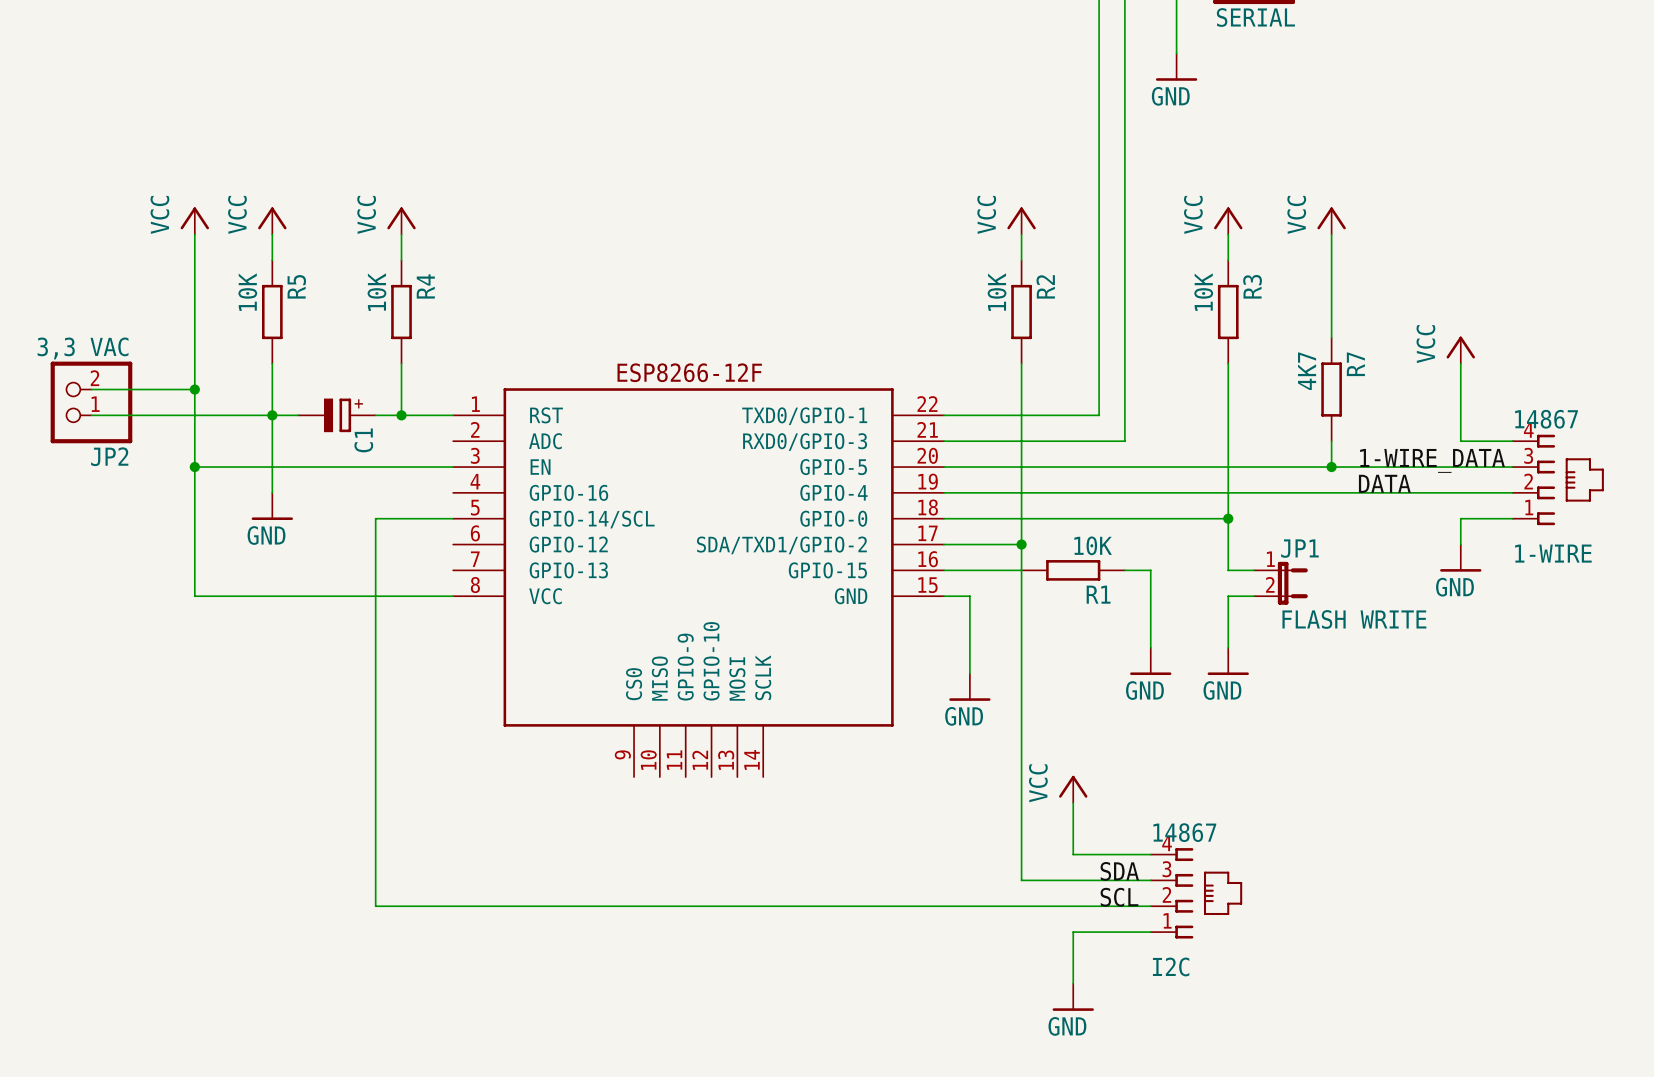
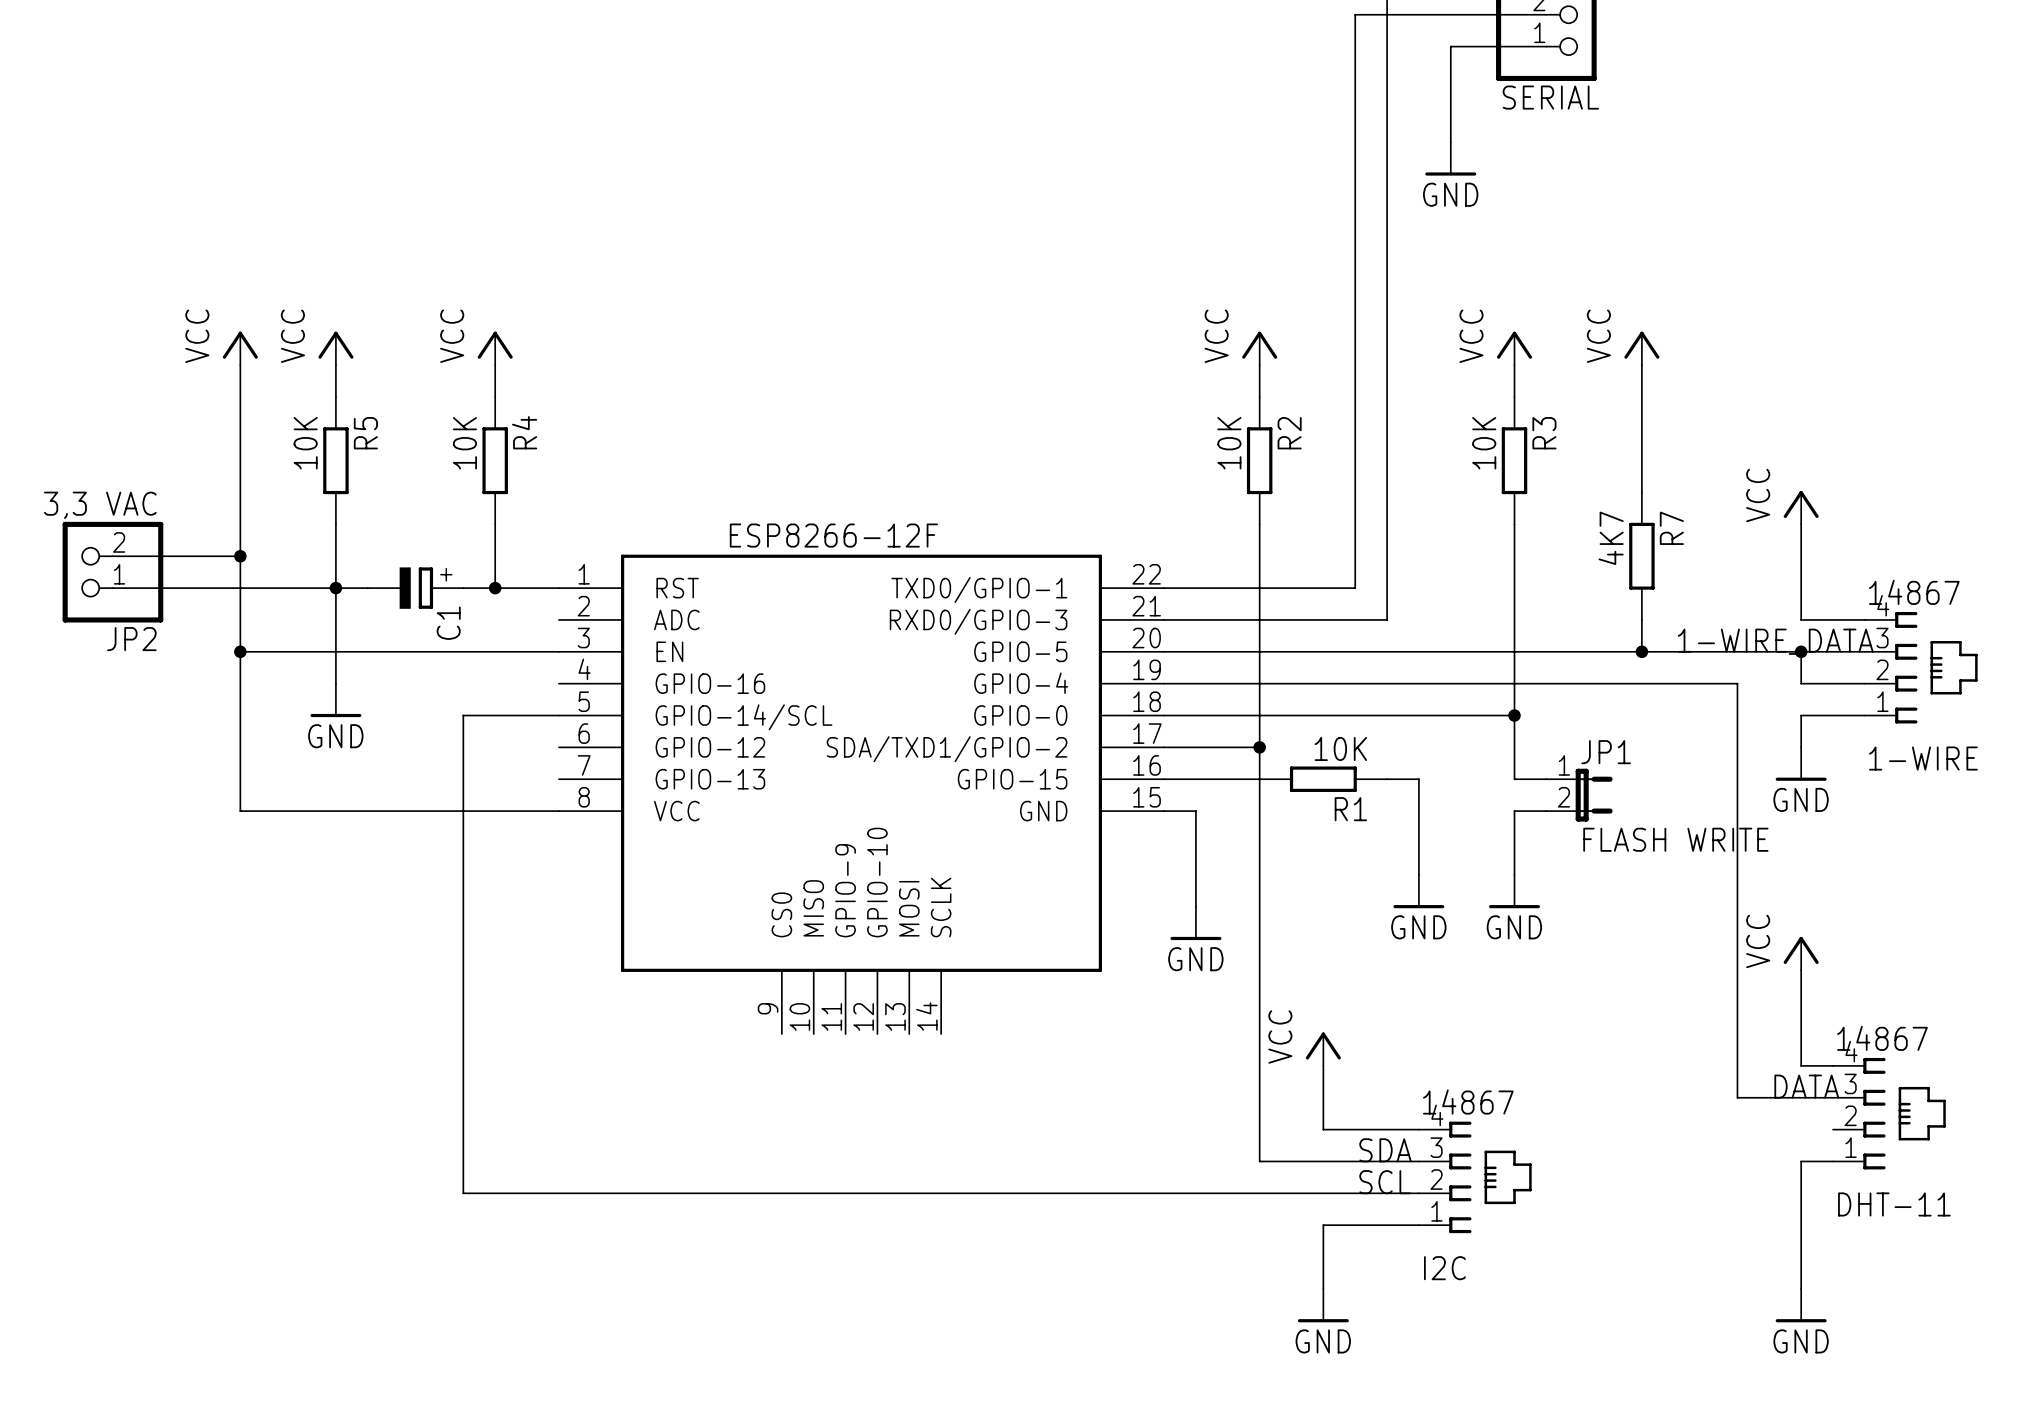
junction: none -> (1801, 651)
label: DATA (1384, 483) -> none
wire: (1409, 492) (1460, 492) -> (1801, 651) (1801, 683)
wire: none -> (1737, 683) (1737, 1097) (1833, 1097)
power symbol: none -> VCC (1801, 953)
wire: none -> (1801, 970) (1801, 1065) (1833, 1065)
label: none -> DATA (1806, 1086)
DHT-11: none -> 14867 (1889, 1113)
wire: none -> (1833, 1161) (1801, 1161) (1801, 1288)
power symbol: none -> GND (1801, 1305)

